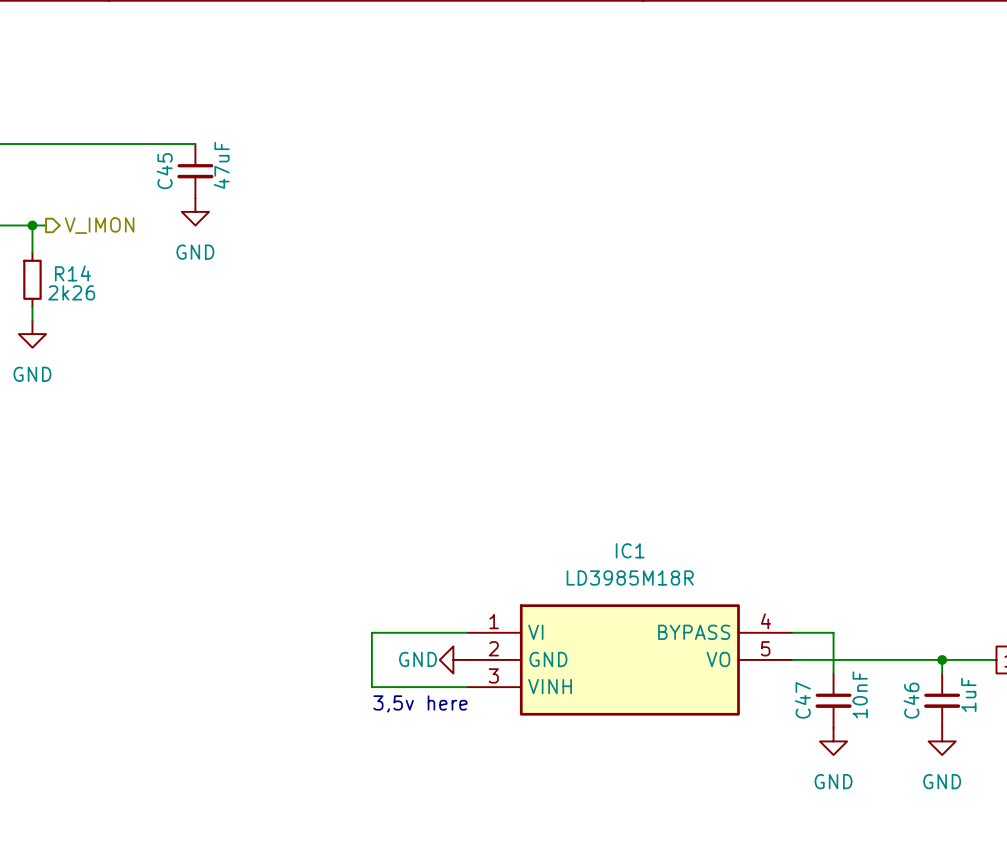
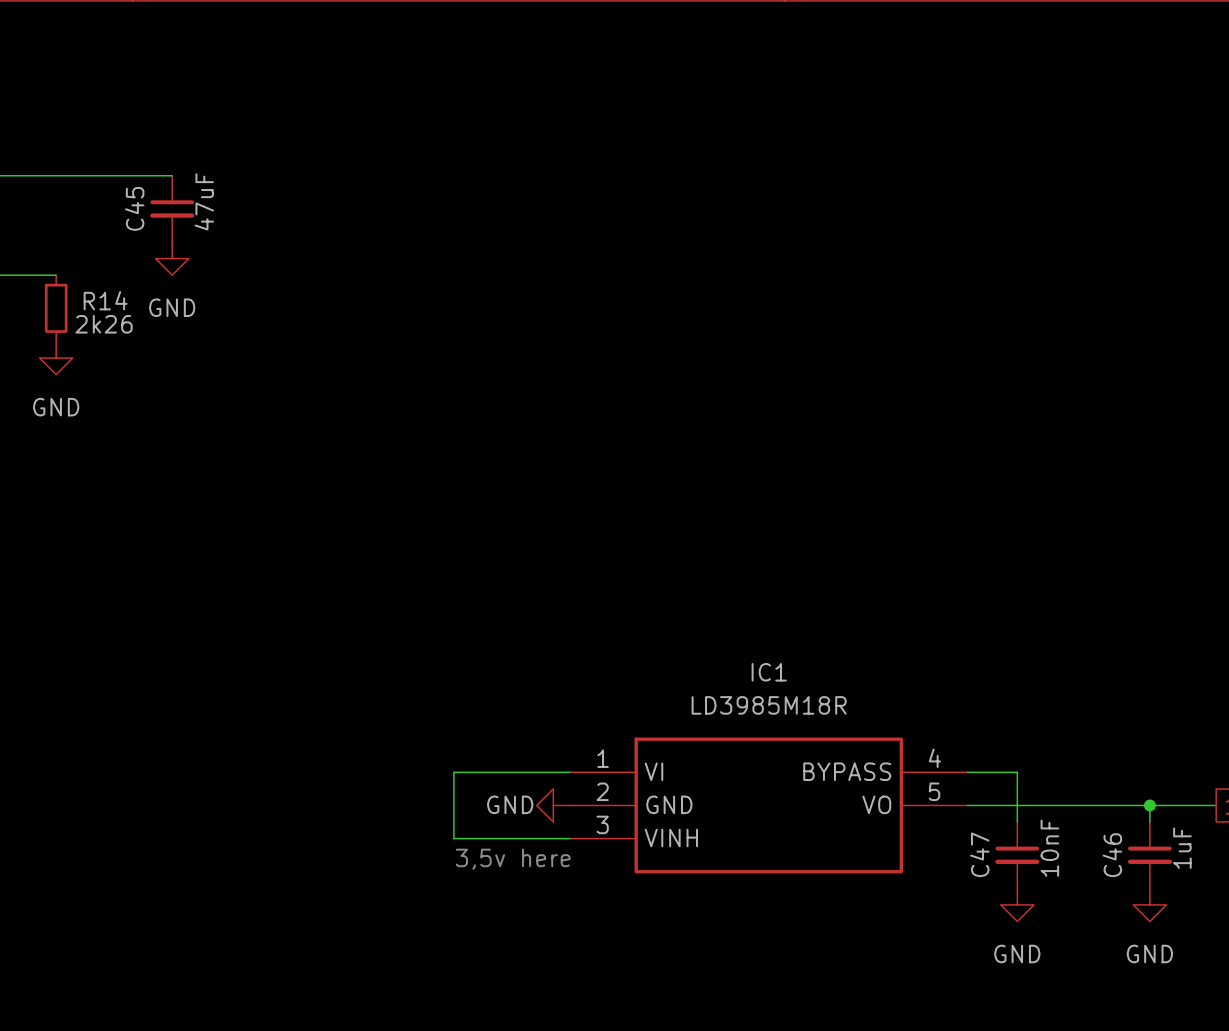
wire: (141, 144) (195, 144) -> none
C45 position: (195, 171) -> (172, 208)
power symbol position: GND (195, 211) -> GND (172, 258)
wire: (32, 225) (32, 252) -> none
junction: (32, 225) -> none
hierarchical label: V_IMON (99, 225) -> none
R14 position: (32, 279) -> (56, 308)
wire: (32, 306) (32, 320) -> none
power symbol position: GND (32, 334) -> GND (56, 358)

